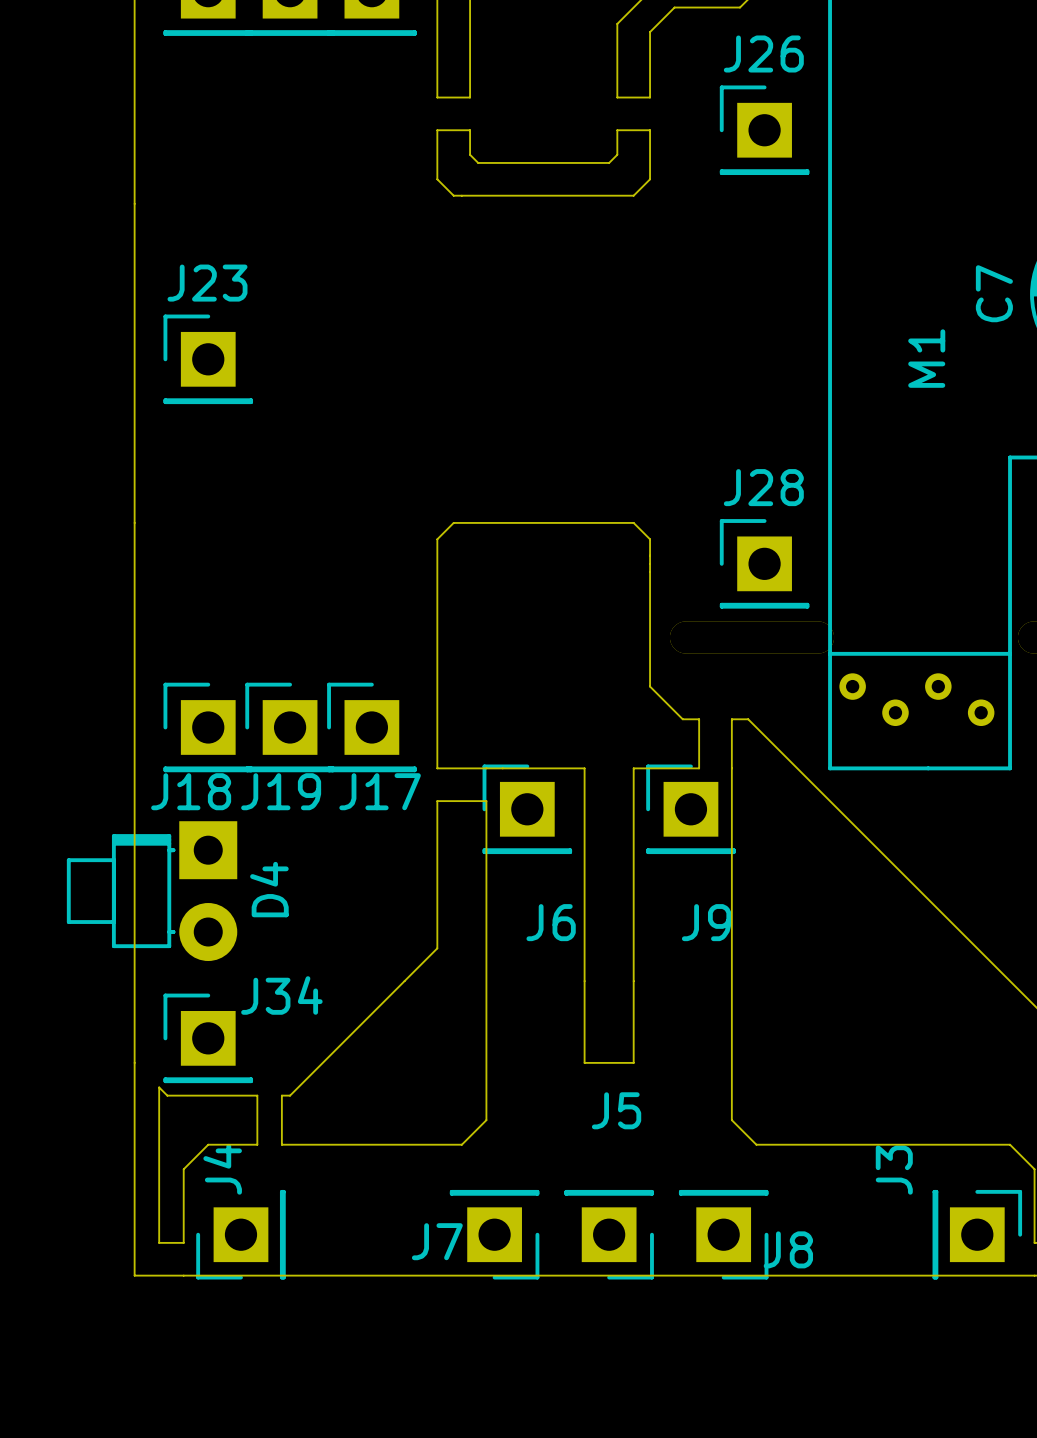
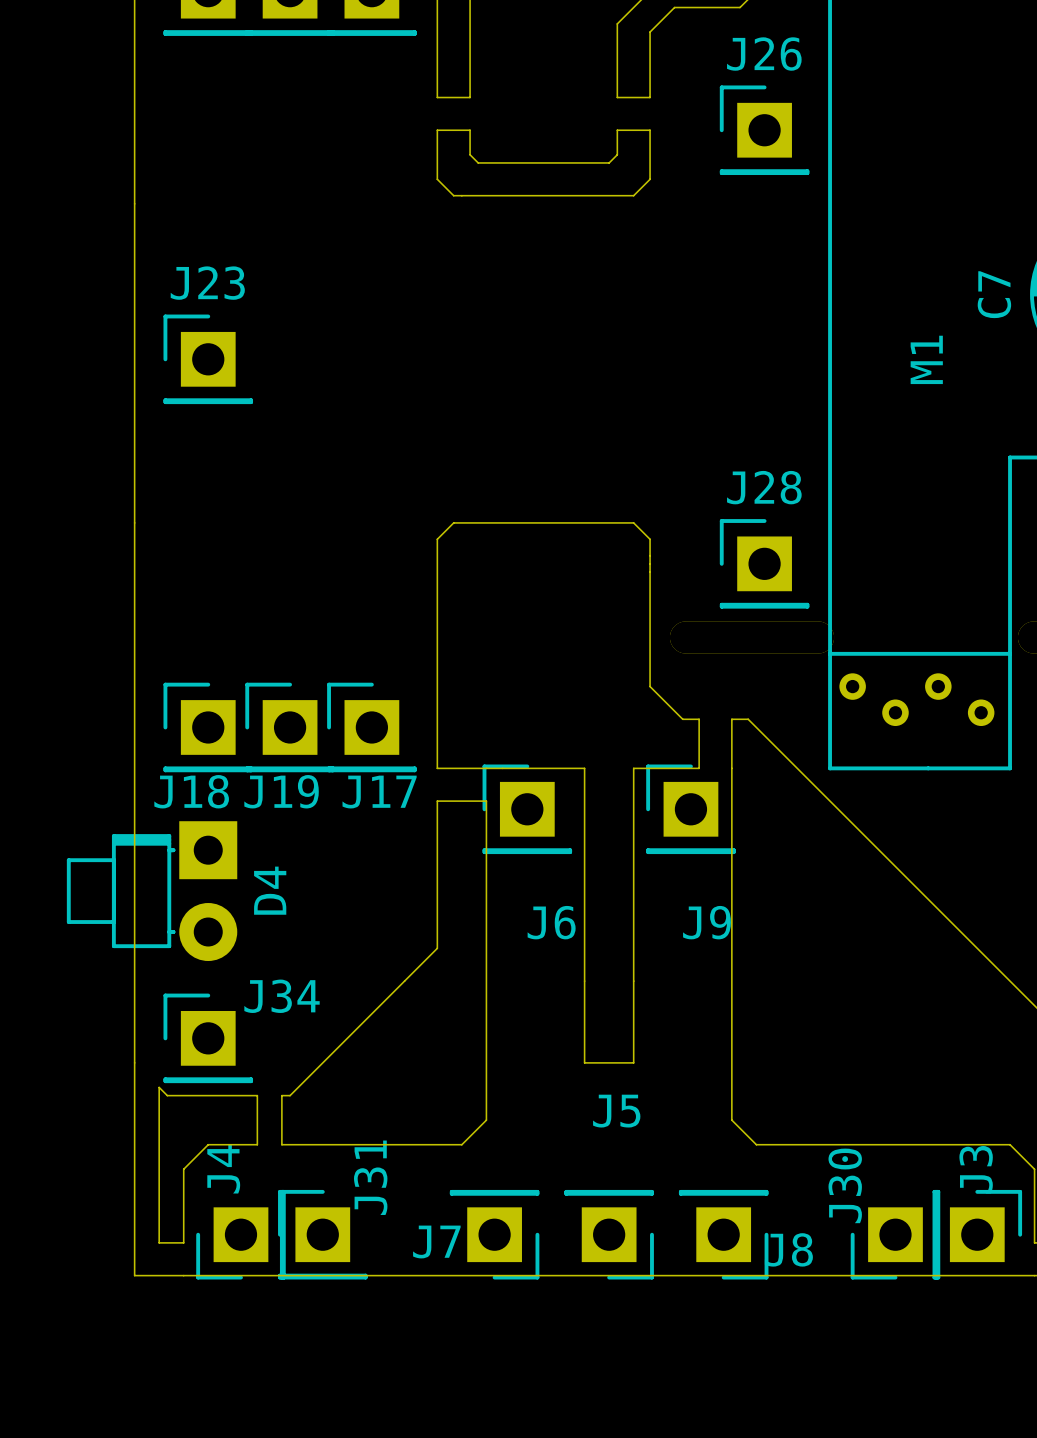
J3 name position: J3 (894, 1170) -> J3 (976, 1169)
J31: none -> (322, 1234)
J30: none -> (895, 1234)

